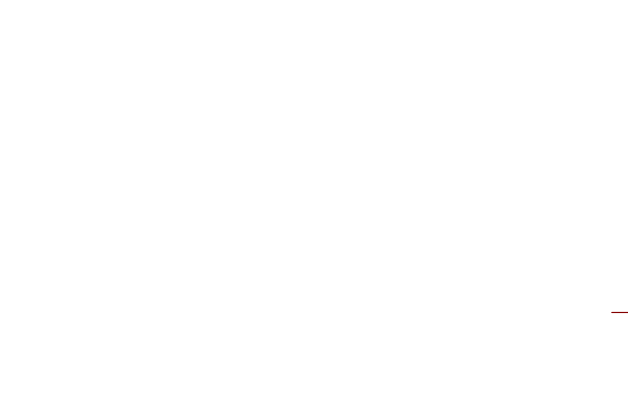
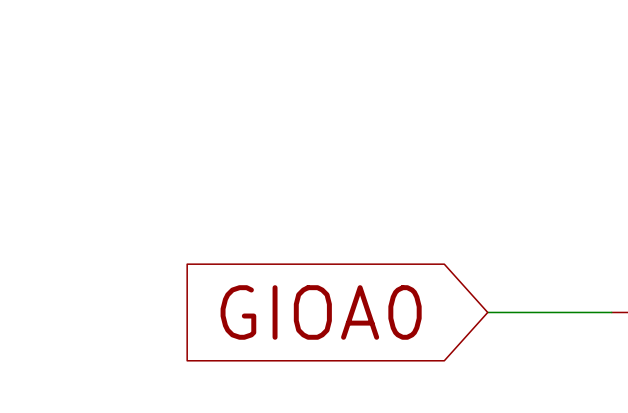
global label: none -> GIOA0 (321, 312)
wire: none -> (487, 312) (611, 312)

